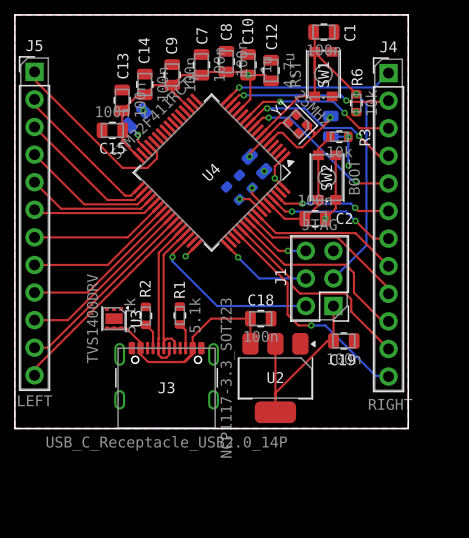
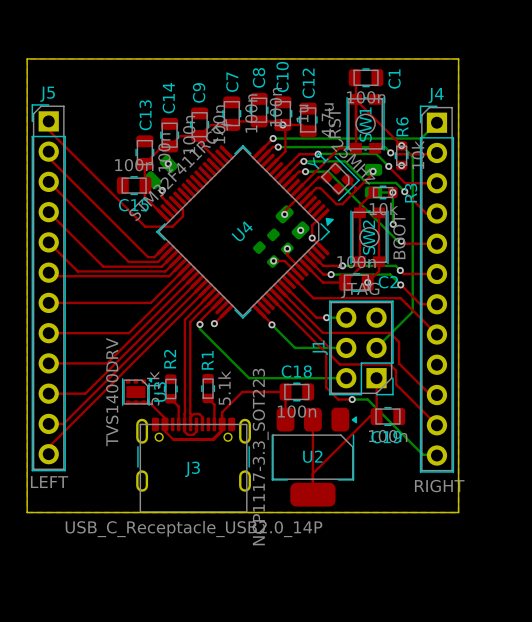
top track: (253, 218) (272, 237) (337, 237) (388, 288) (388, 293) -> none

